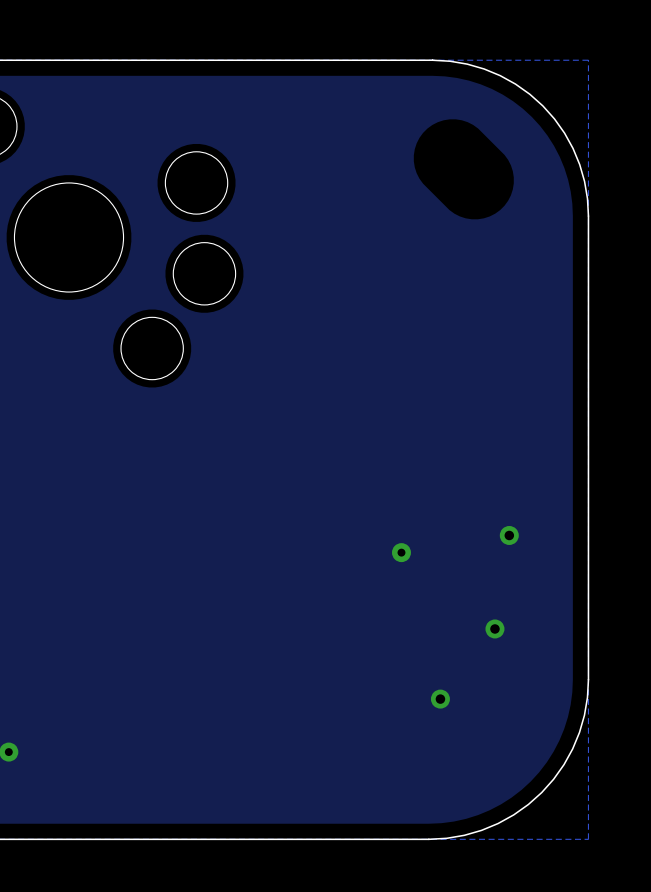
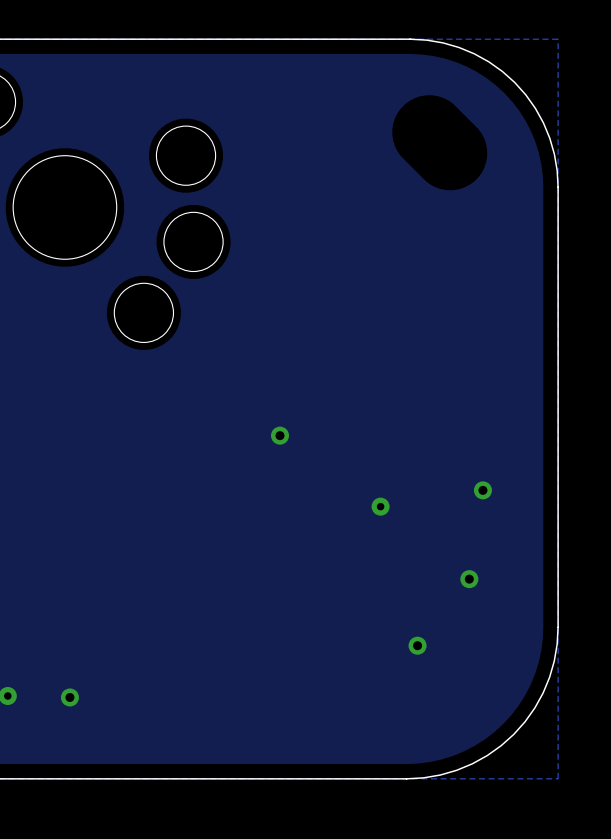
via: none -> (279, 435)
via: none -> (69, 697)

